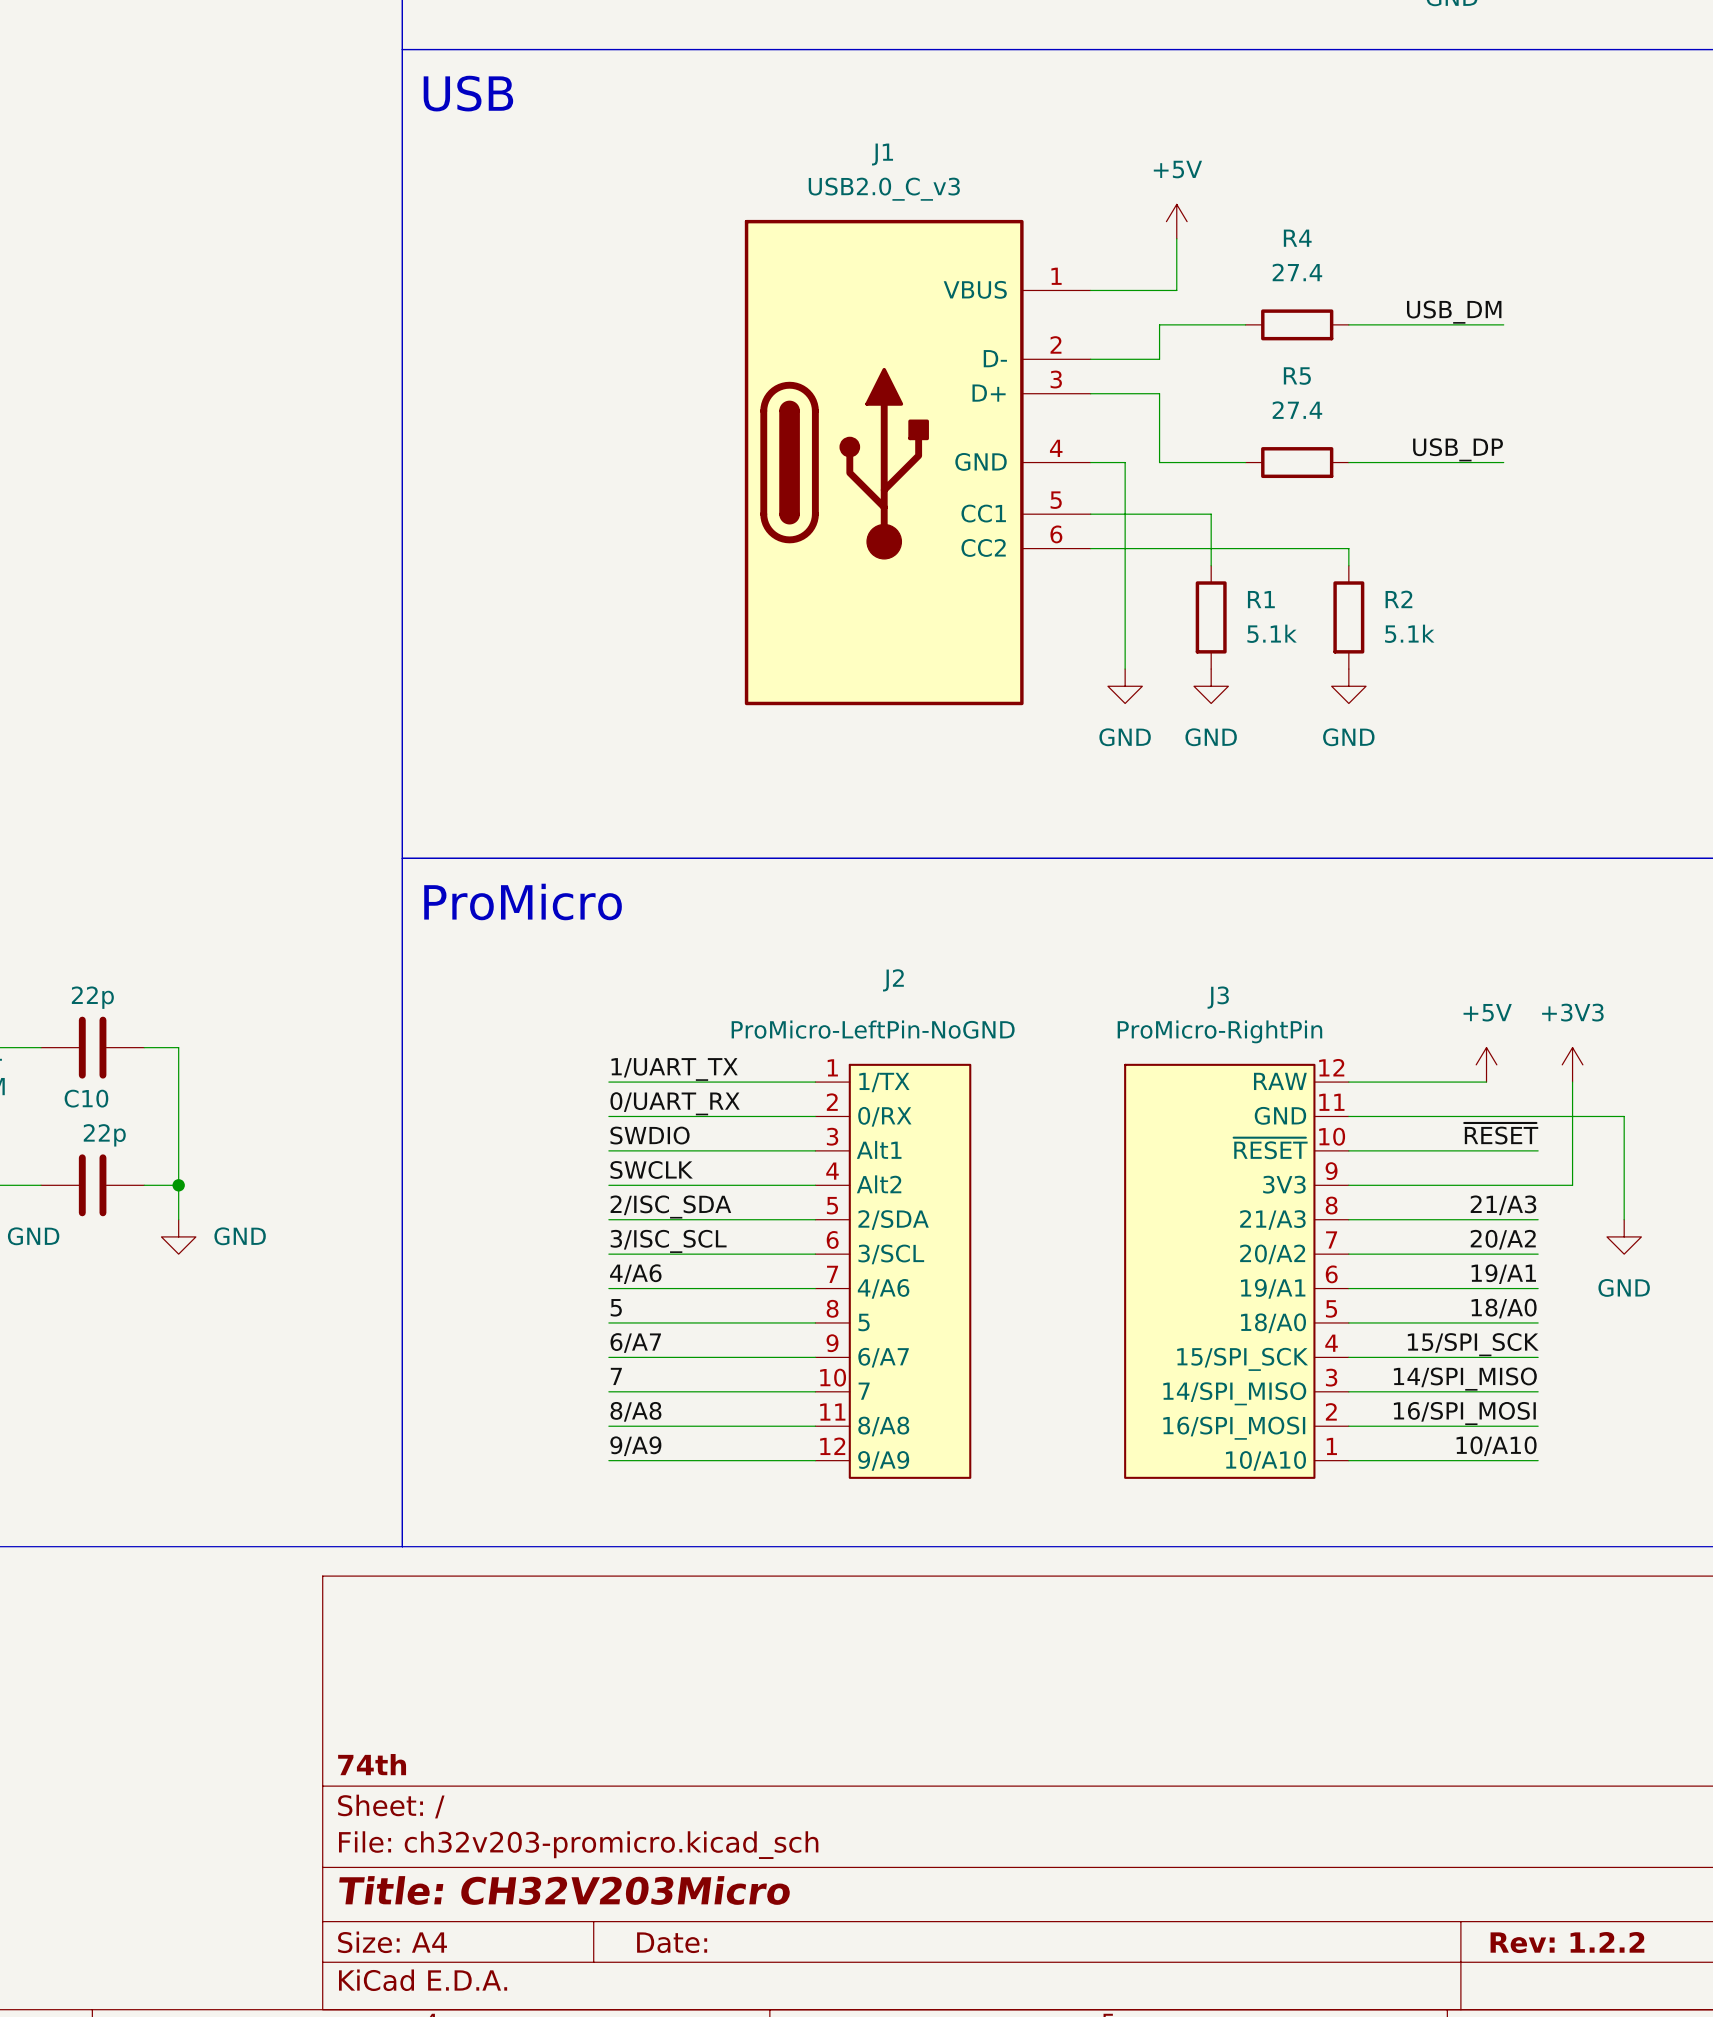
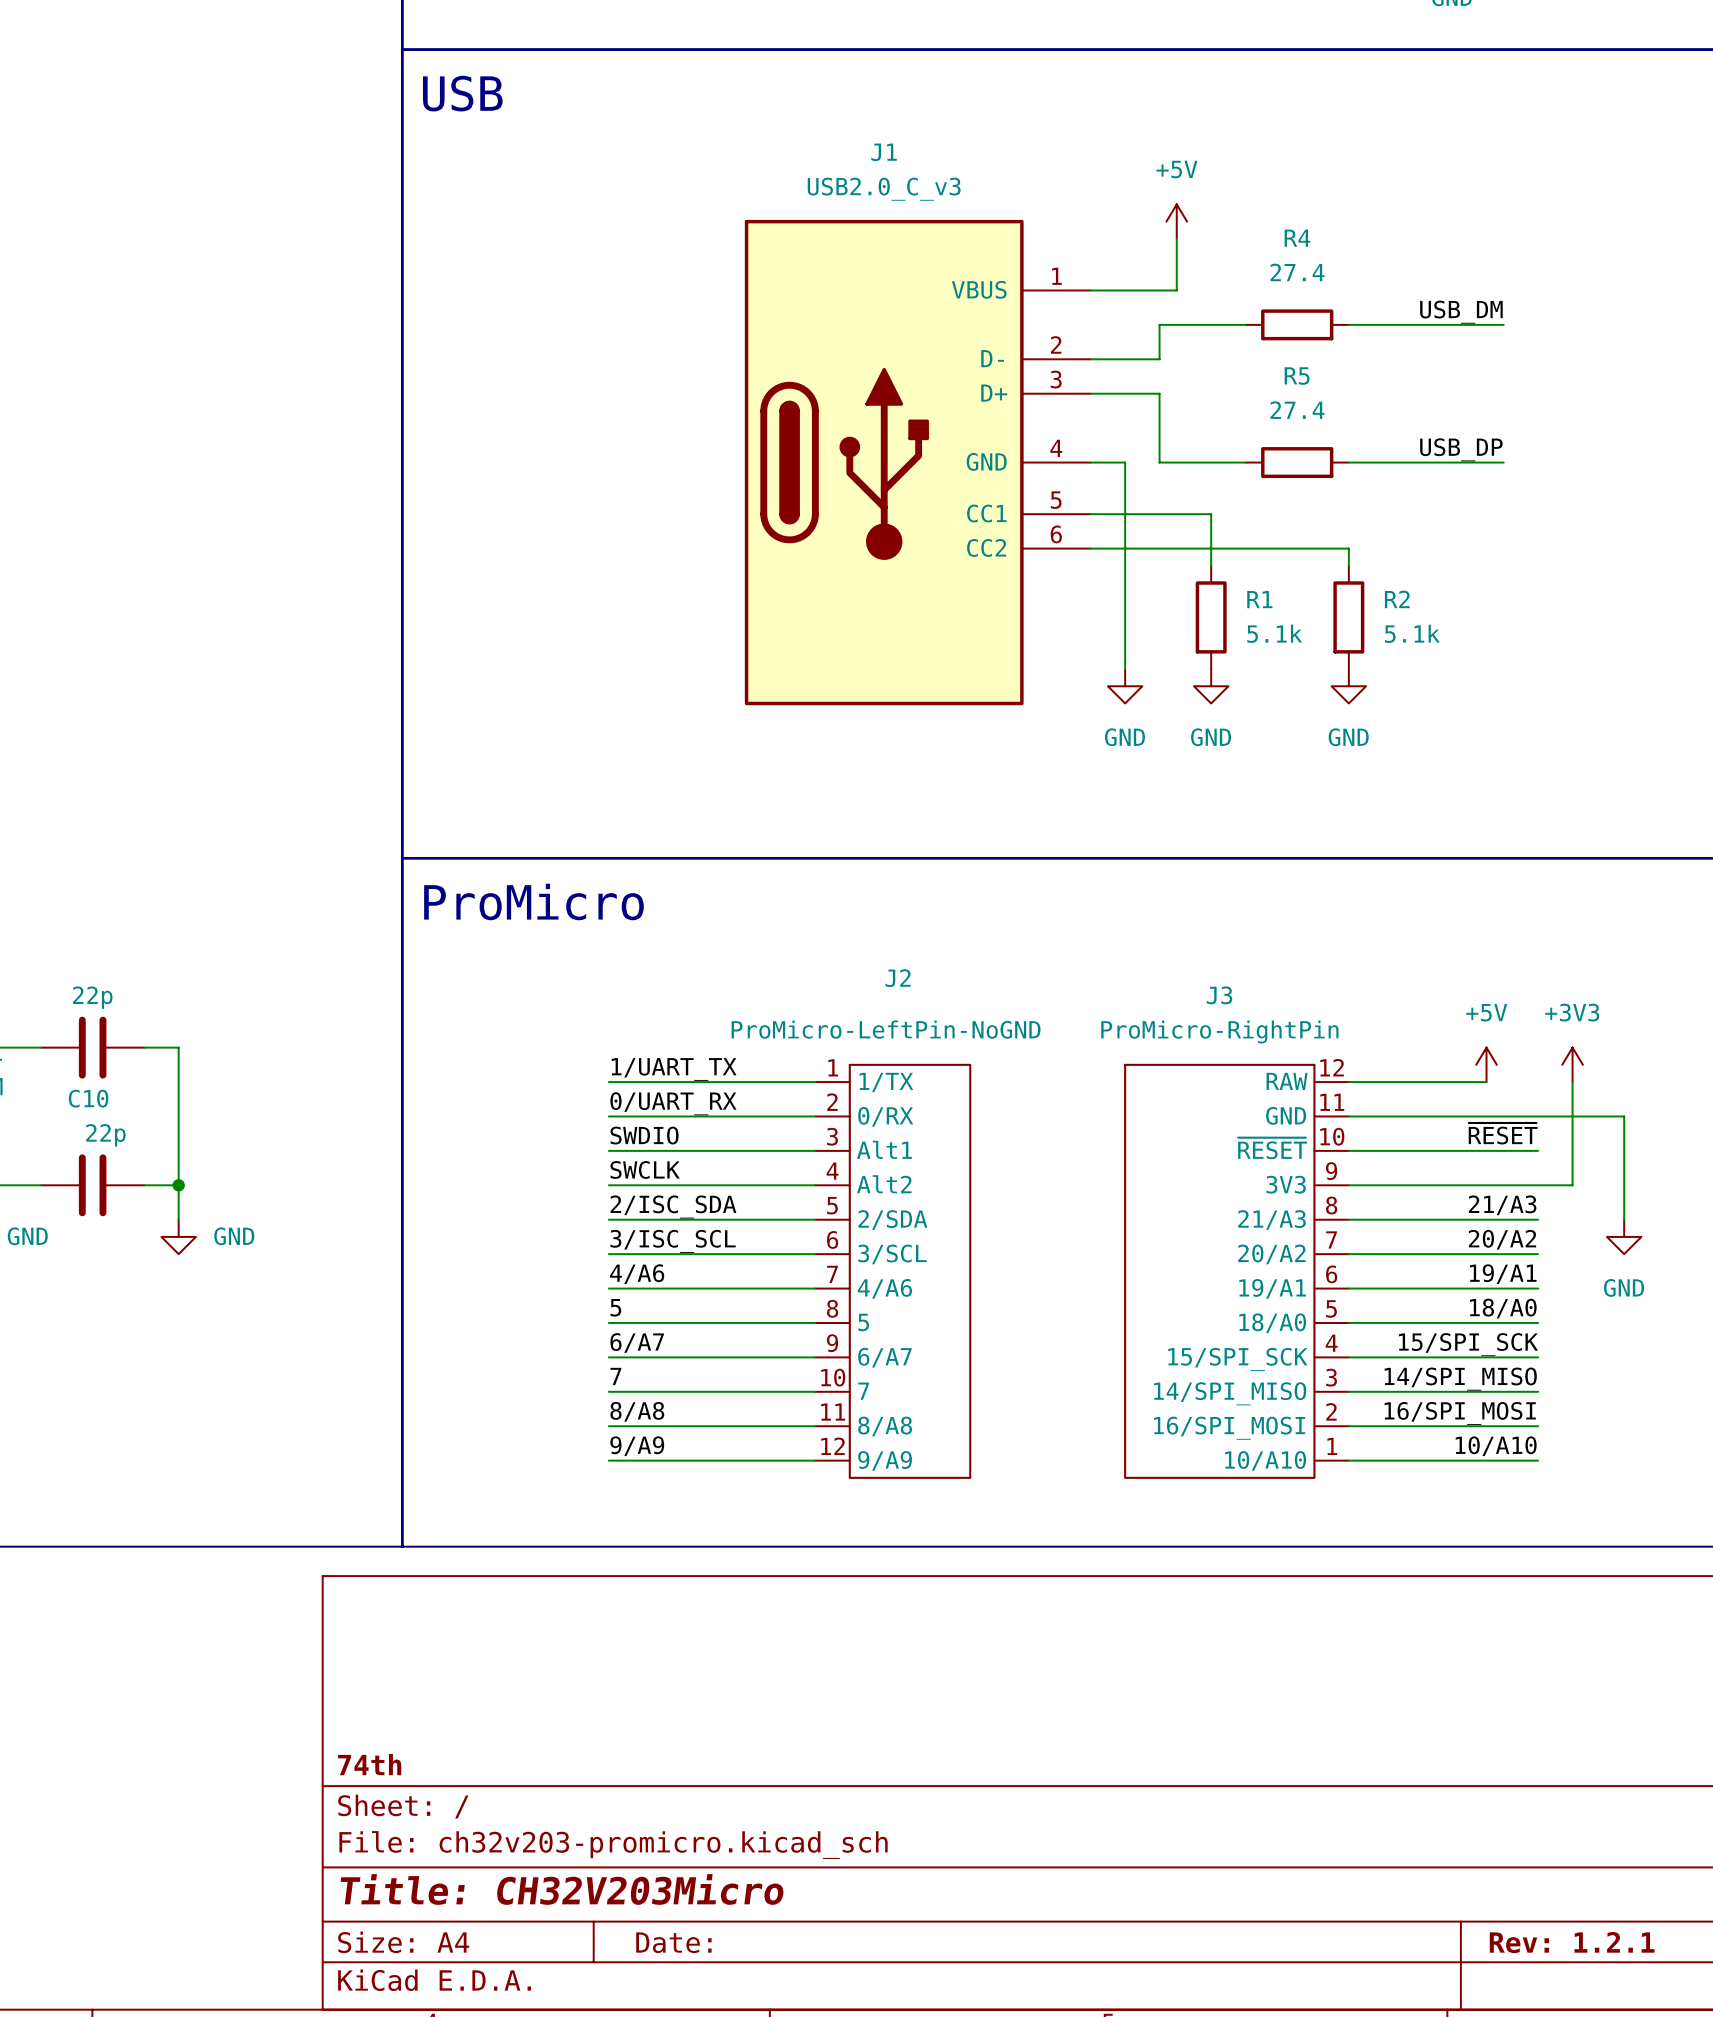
J2 symbol: [815, 1063, 972, 1479] -> [815, 1063, 972, 1479]
J3 symbol: [1124, 1063, 1349, 1479] -> [1124, 1063, 1349, 1479]
title block: Rev: 1.2.2 (1567, 1942) -> Rev: 1.2.1 (1572, 1942)

